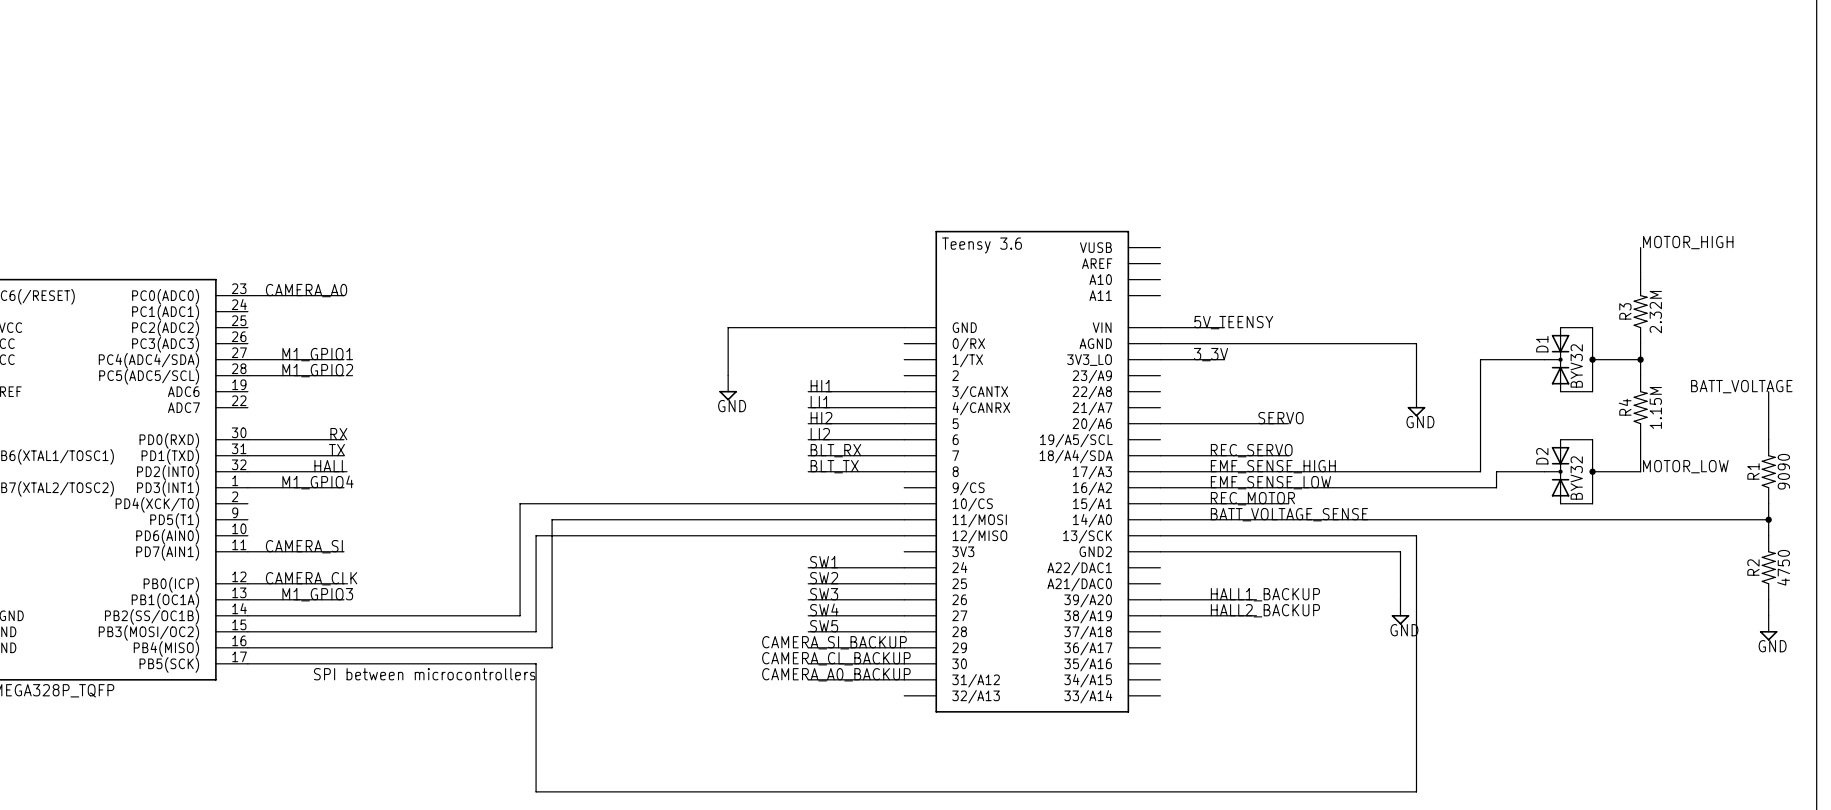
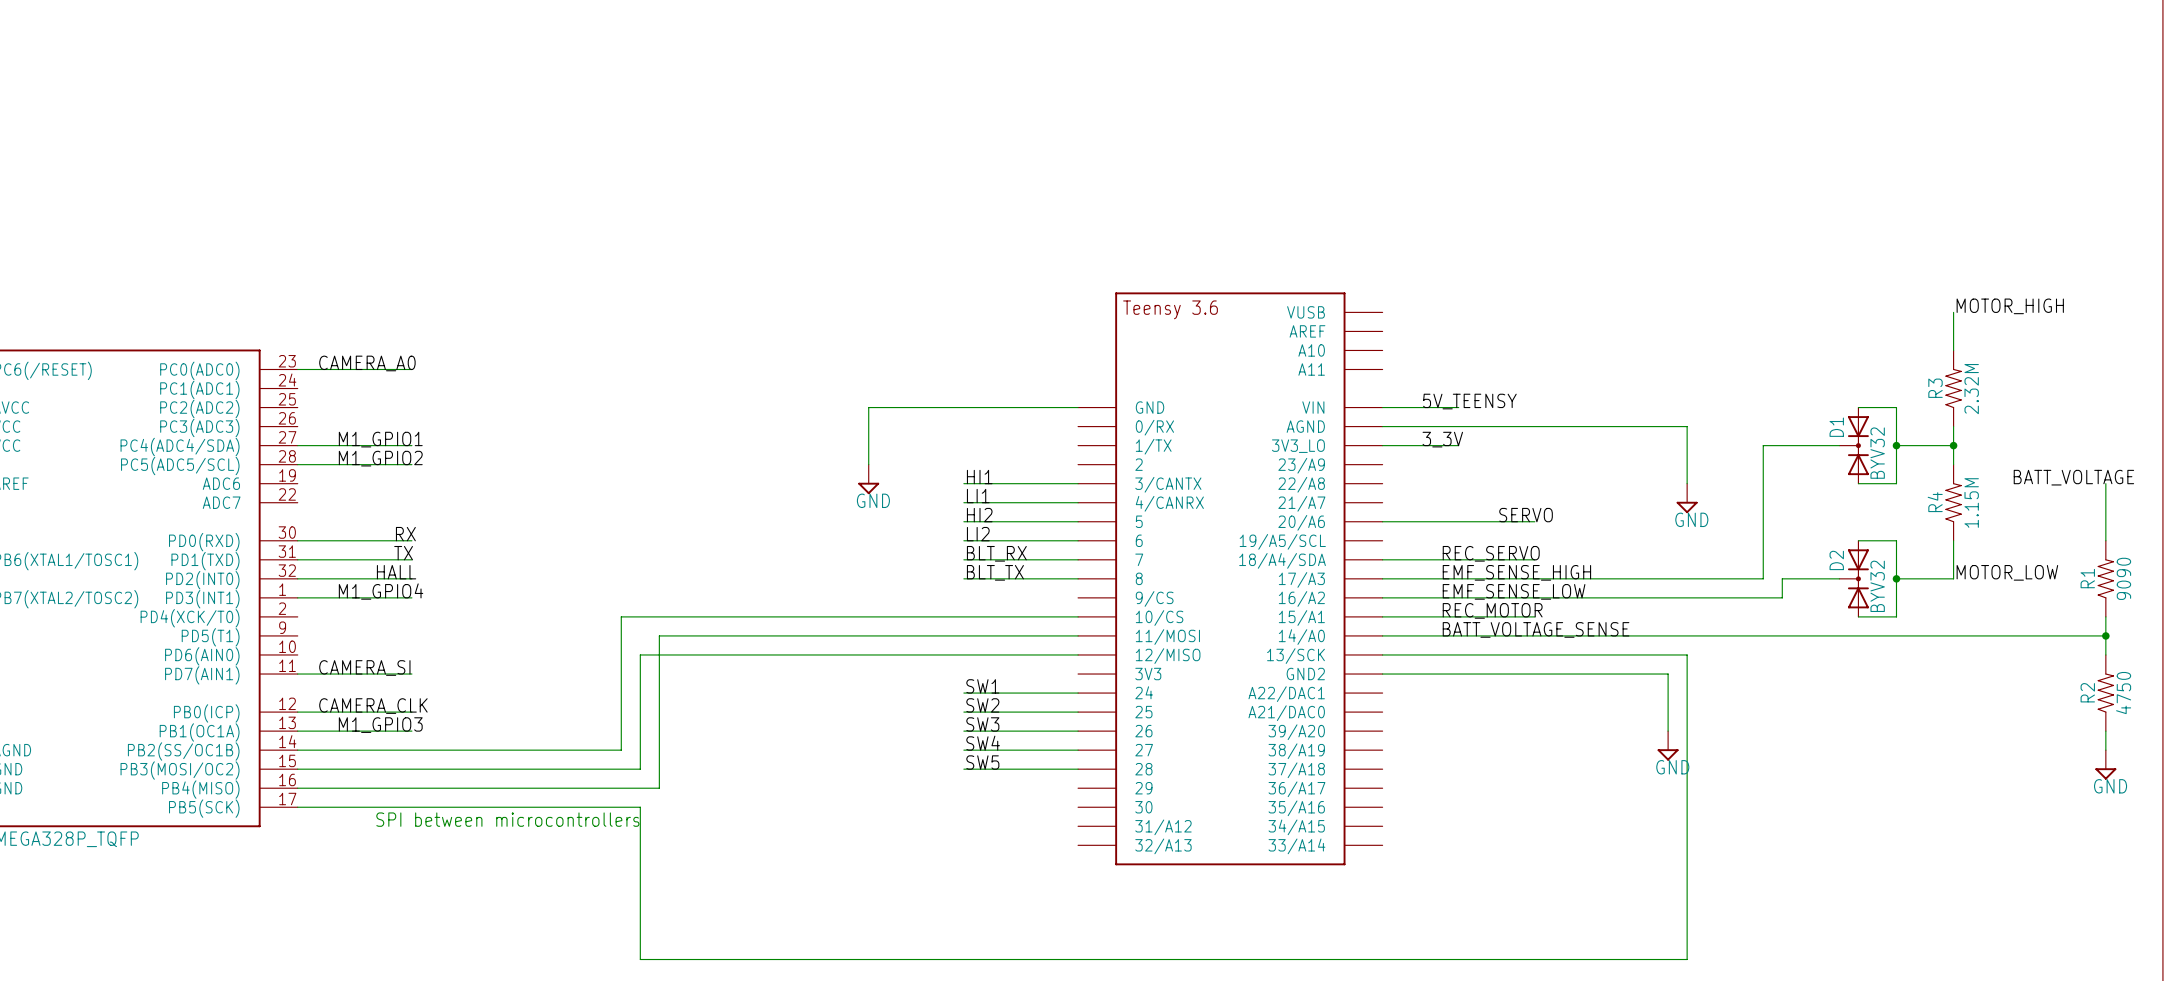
label: HALL1_BACKUP (1265, 594) -> none
wire: (1160, 599) (1256, 599) -> none
label: HALL2_BACKUP (1265, 610) -> none
wire: (1160, 615) (1256, 615) -> none
label: CAMERA_SI_BACKUP (834, 642) -> none
wire: (808, 647) (904, 647) -> none
label: CAMERA_CL_BACKUP (836, 658) -> none
wire: (808, 663) (904, 663) -> none
label: CAMERA_A0_BACKUP (836, 674) -> none
wire: (808, 679) (904, 679) -> none

